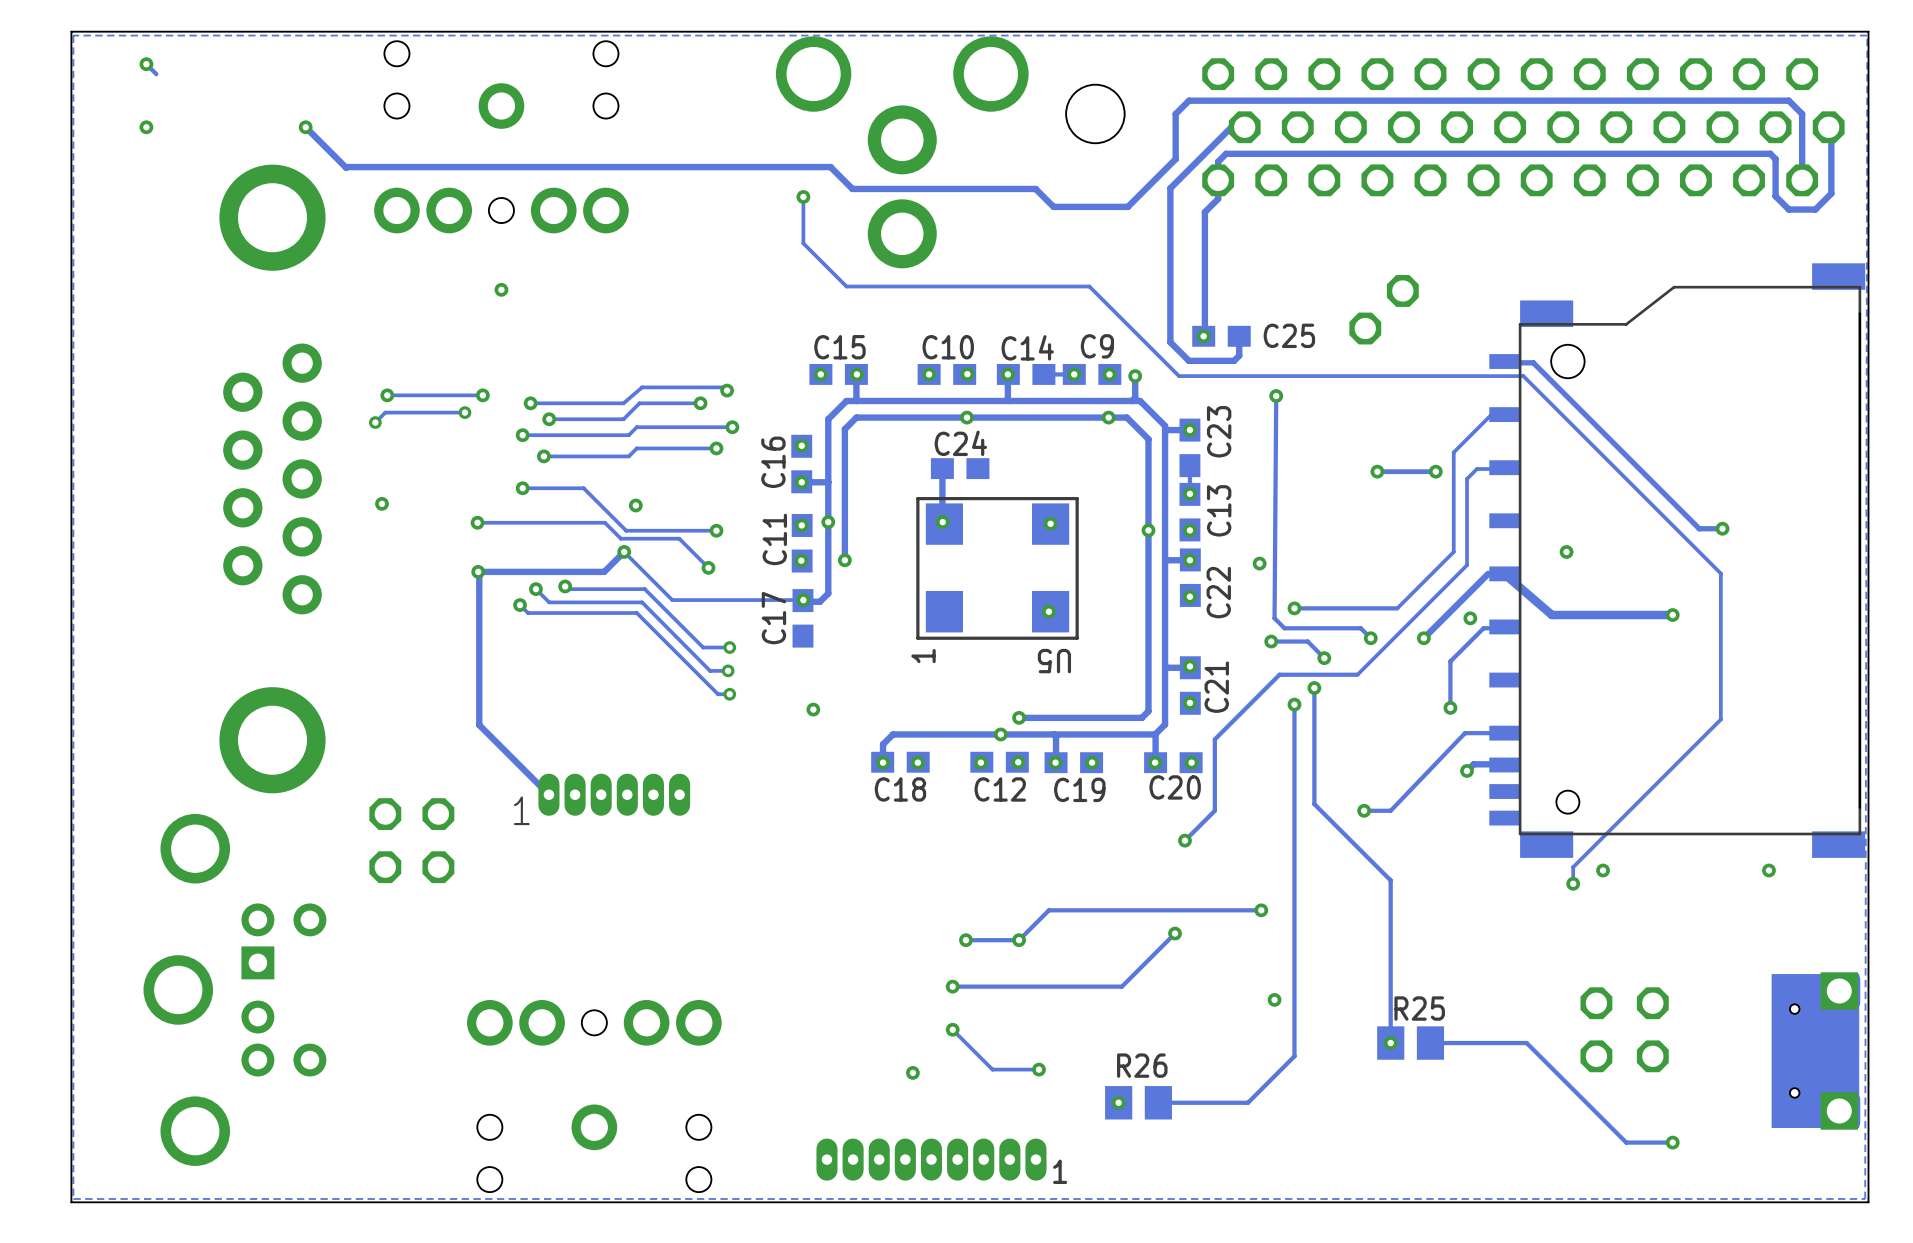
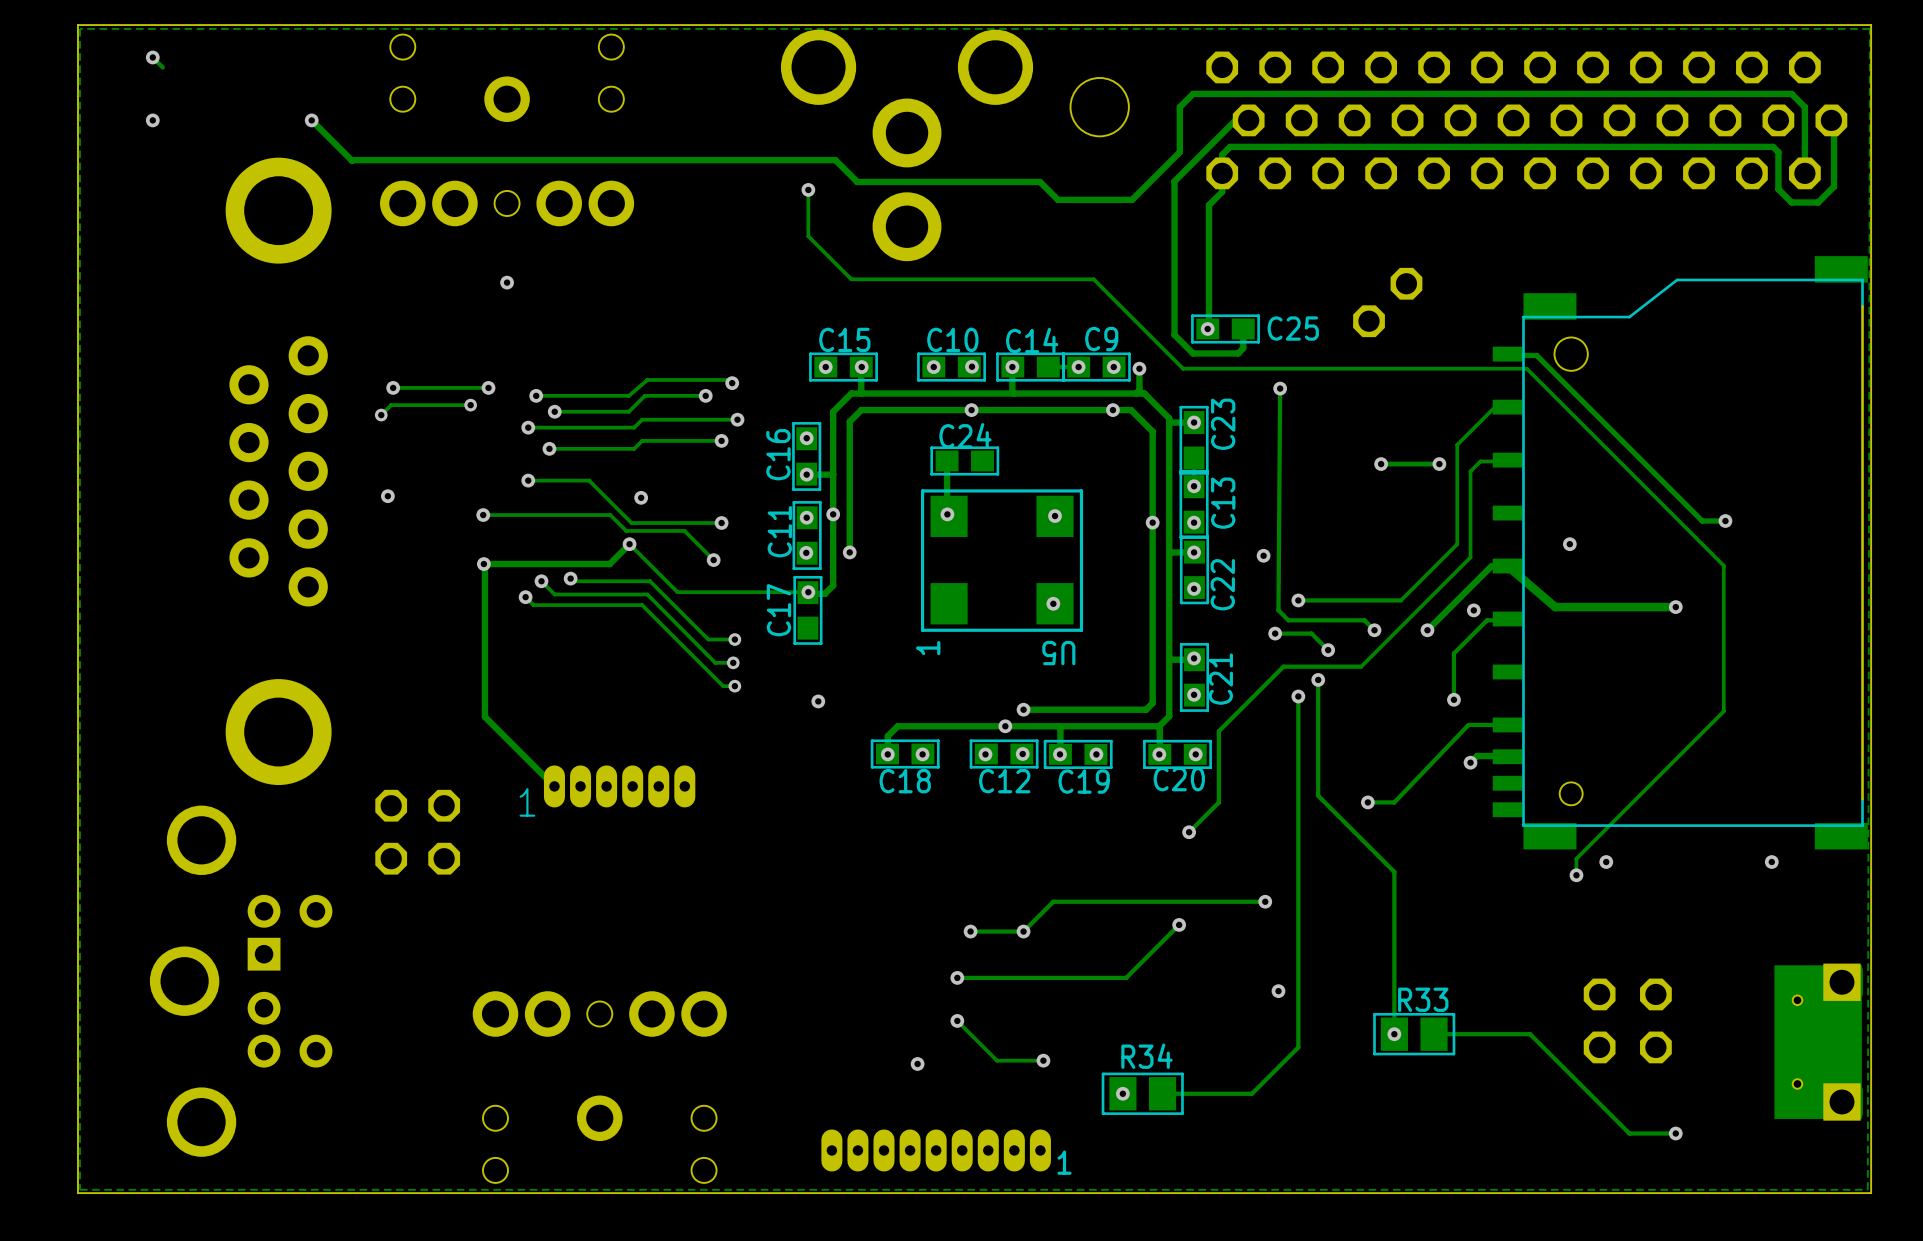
C25 footprint: [1192, 325, 1251, 347] -> [1191, 314, 1260, 344]
C15 footprint: [809, 364, 868, 385] -> [809, 352, 878, 382]
C10 footprint: [917, 364, 977, 385] -> [917, 352, 986, 382]
C14 footprint: [996, 364, 1056, 385] -> [996, 352, 1066, 382]
C9 footprint: [1062, 364, 1122, 385] -> [1061, 352, 1131, 382]
C23 footprint: [1179, 418, 1201, 478] -> [1179, 405, 1209, 475]
C16 footprint: [791, 434, 813, 494] -> [792, 422, 822, 491]
C24 footprint: [930, 458, 990, 480] -> [930, 446, 1000, 476]
C13 footprint: [1179, 482, 1201, 542] -> [1179, 470, 1209, 539]
C11 footprint: [791, 513, 813, 573] -> [792, 501, 822, 570]
C22 footprint: [1179, 548, 1201, 607] -> [1179, 535, 1210, 605]
C17 footprint: [792, 589, 814, 648] -> [793, 575, 823, 645]
C21 footprint: [1179, 656, 1201, 715] -> [1179, 643, 1210, 712]
C18 footprint: [871, 751, 930, 773] -> [870, 739, 940, 769]
C12 footprint: [970, 751, 1029, 773] -> [969, 739, 1039, 769]
C19 footprint: [1044, 752, 1104, 774] -> [1043, 739, 1113, 769]
C20 footprint: [1144, 752, 1203, 774] -> [1143, 739, 1212, 769]
R25: (1410, 1043) -> none
R33: none -> (1414, 1034)
R26: (1138, 1102) -> none
R34: none -> (1142, 1093)

